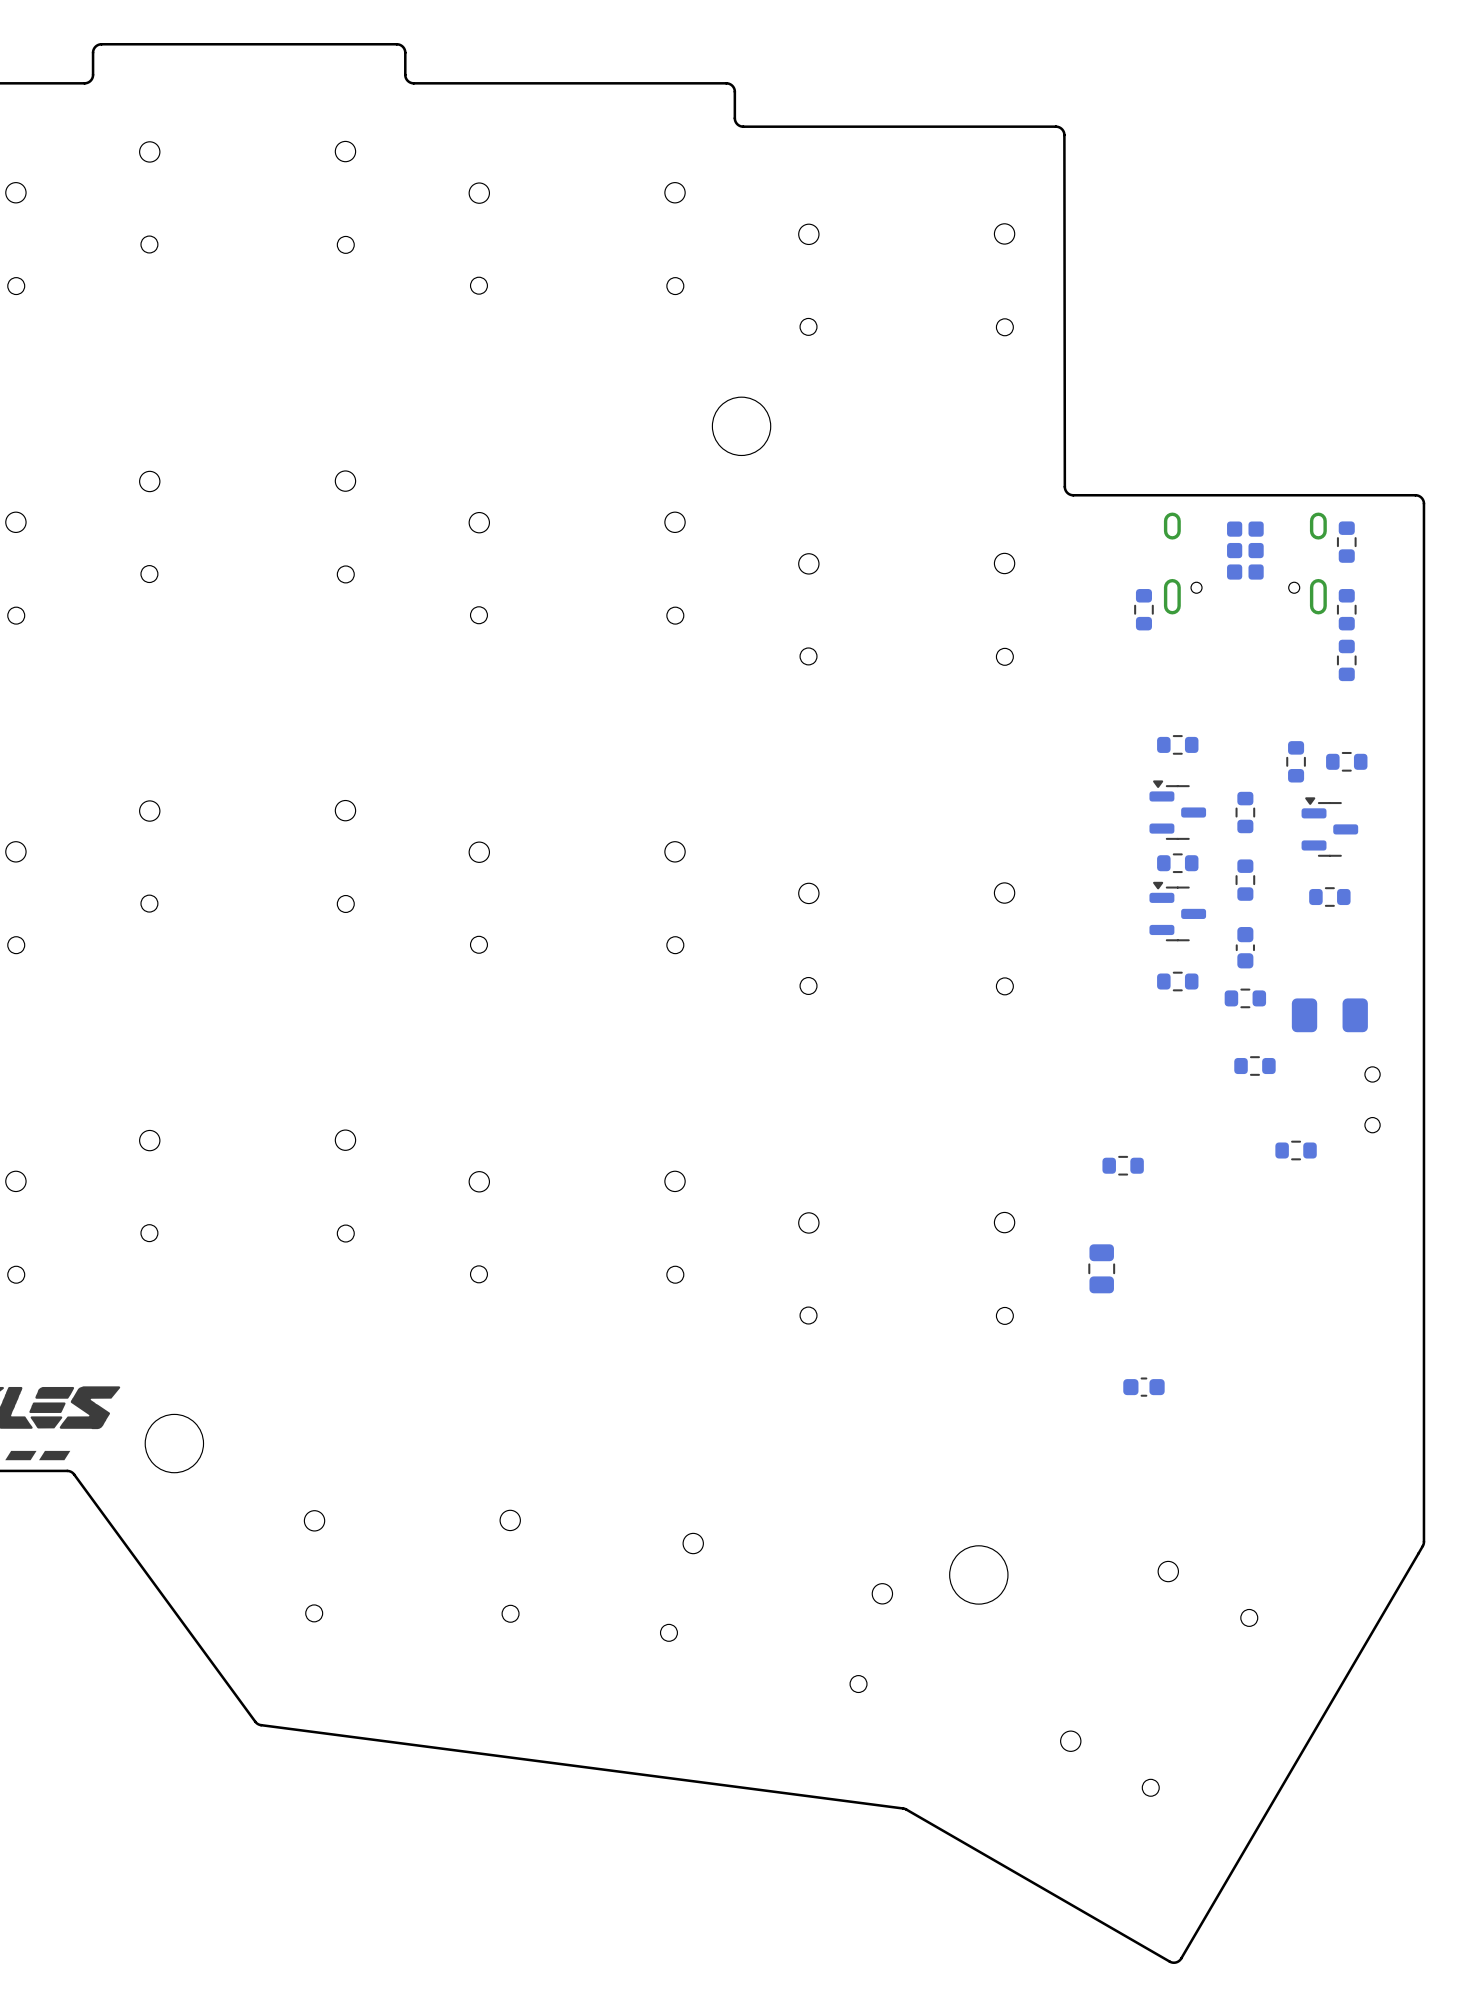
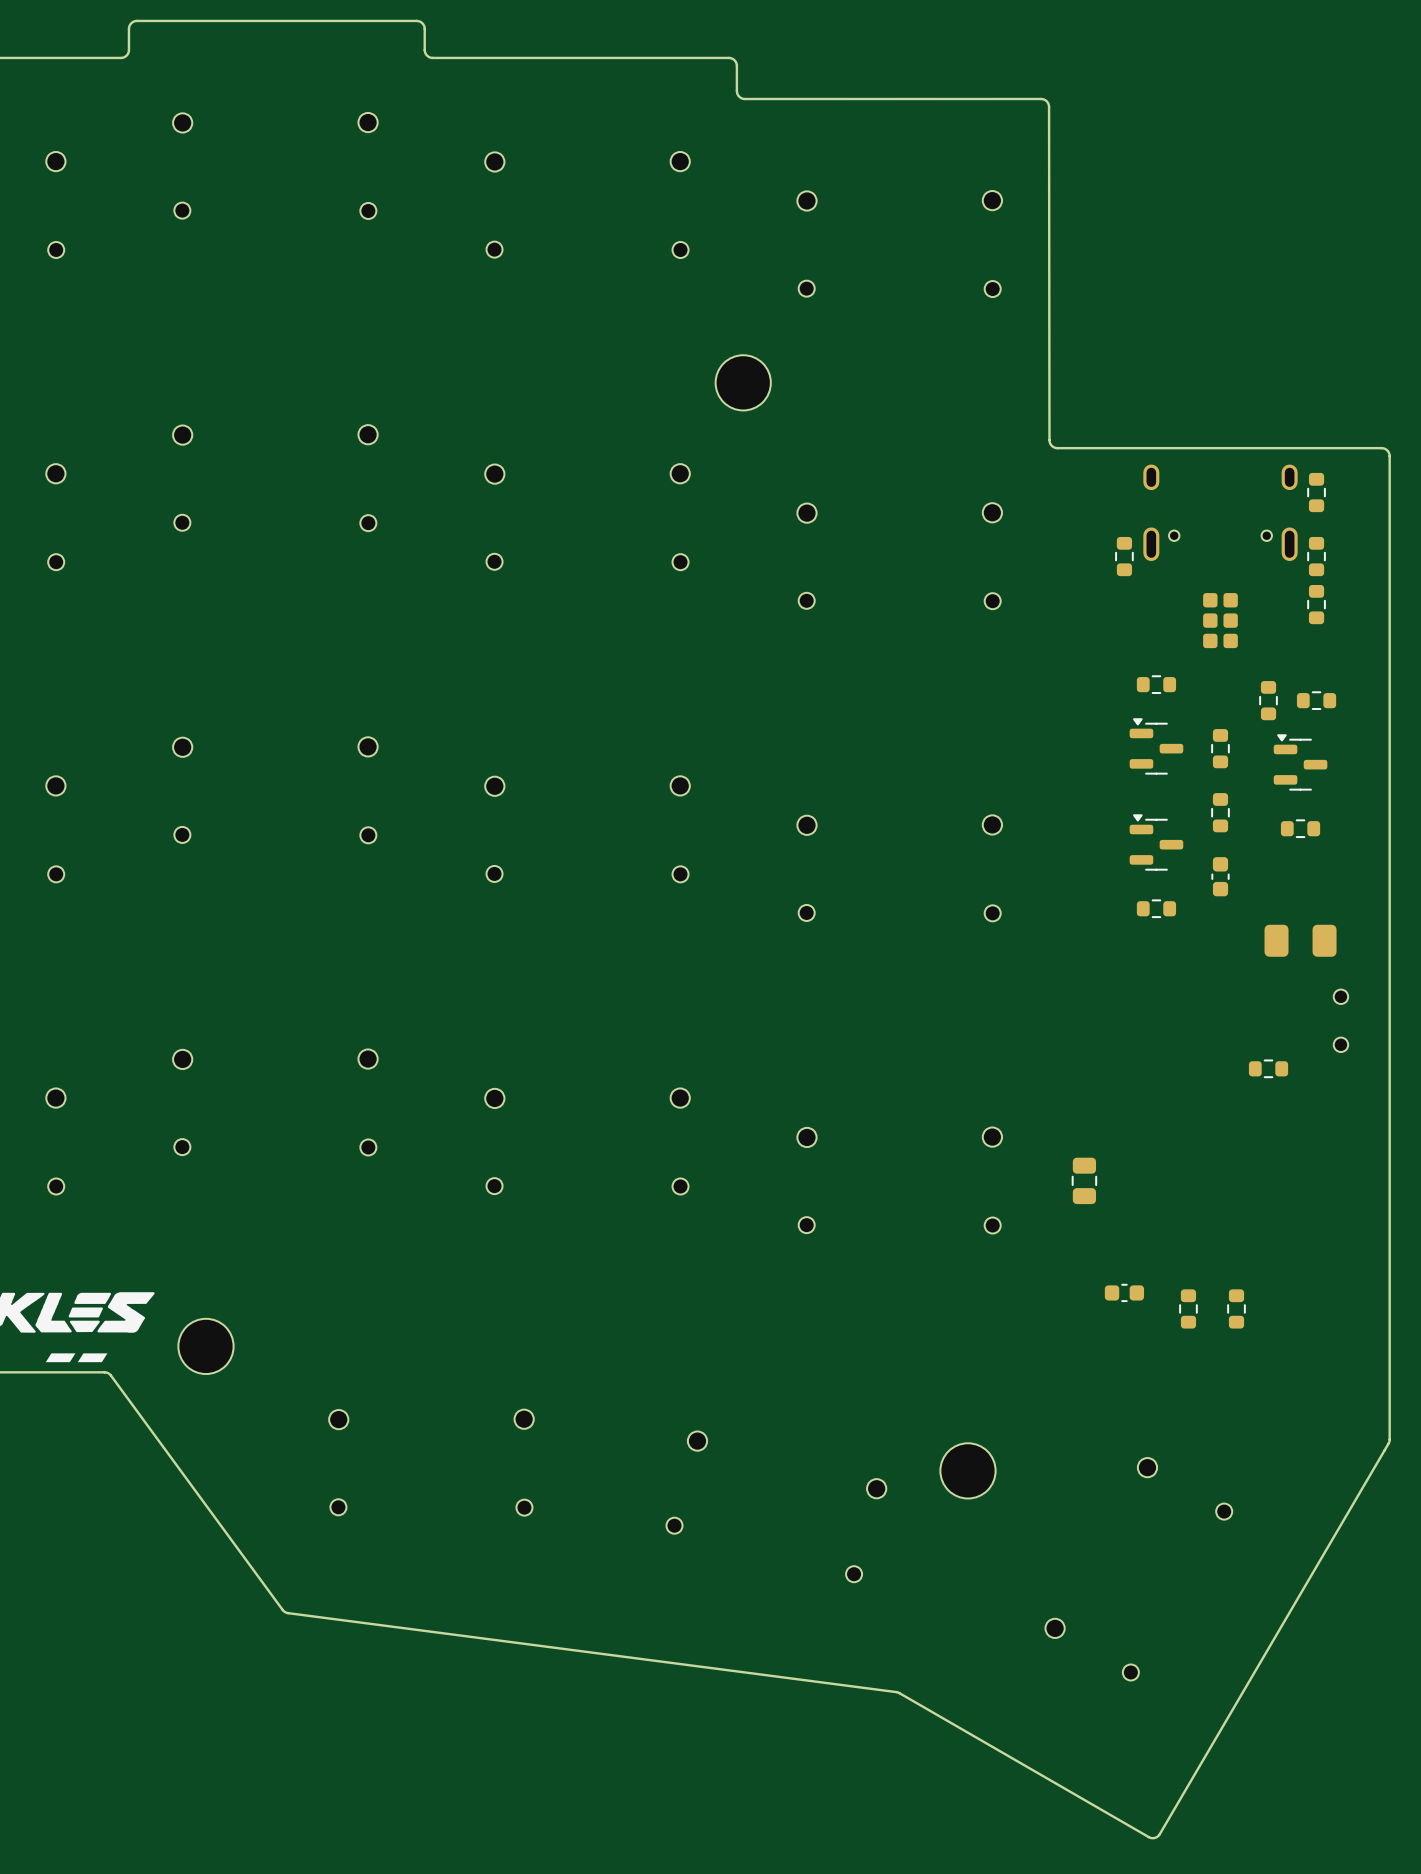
part position: (1245, 550) -> (1220, 620)
part: (1177, 863) -> none
part: (1245, 998) -> none
part: (1254, 1066) -> none
part: (1123, 1165) -> none
part: none -> (1188, 1308)
part: none -> (1236, 1308)

